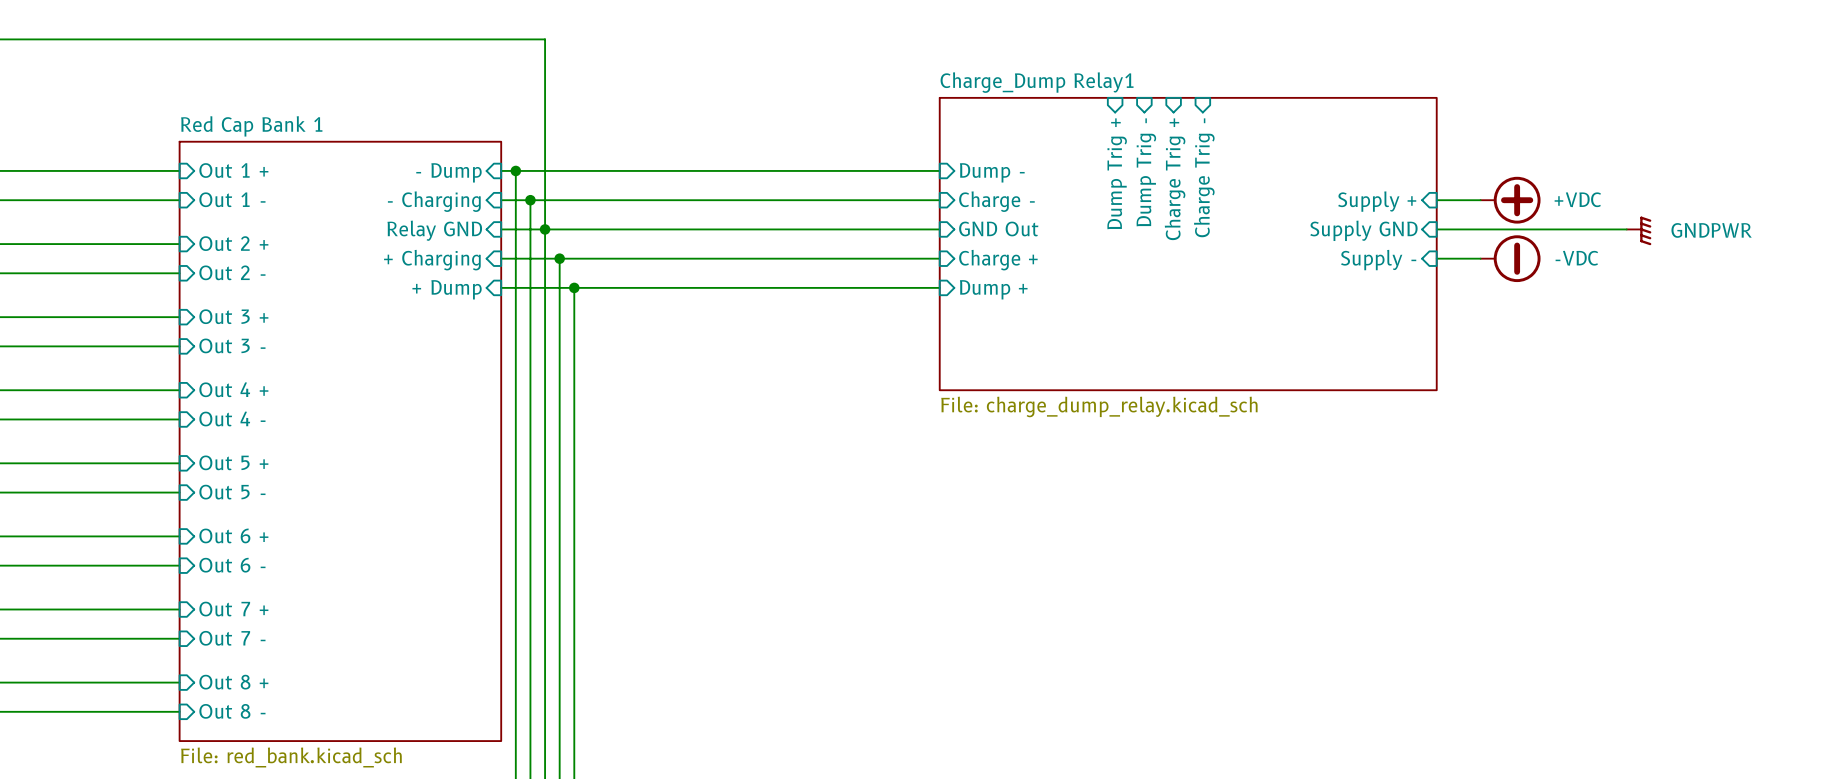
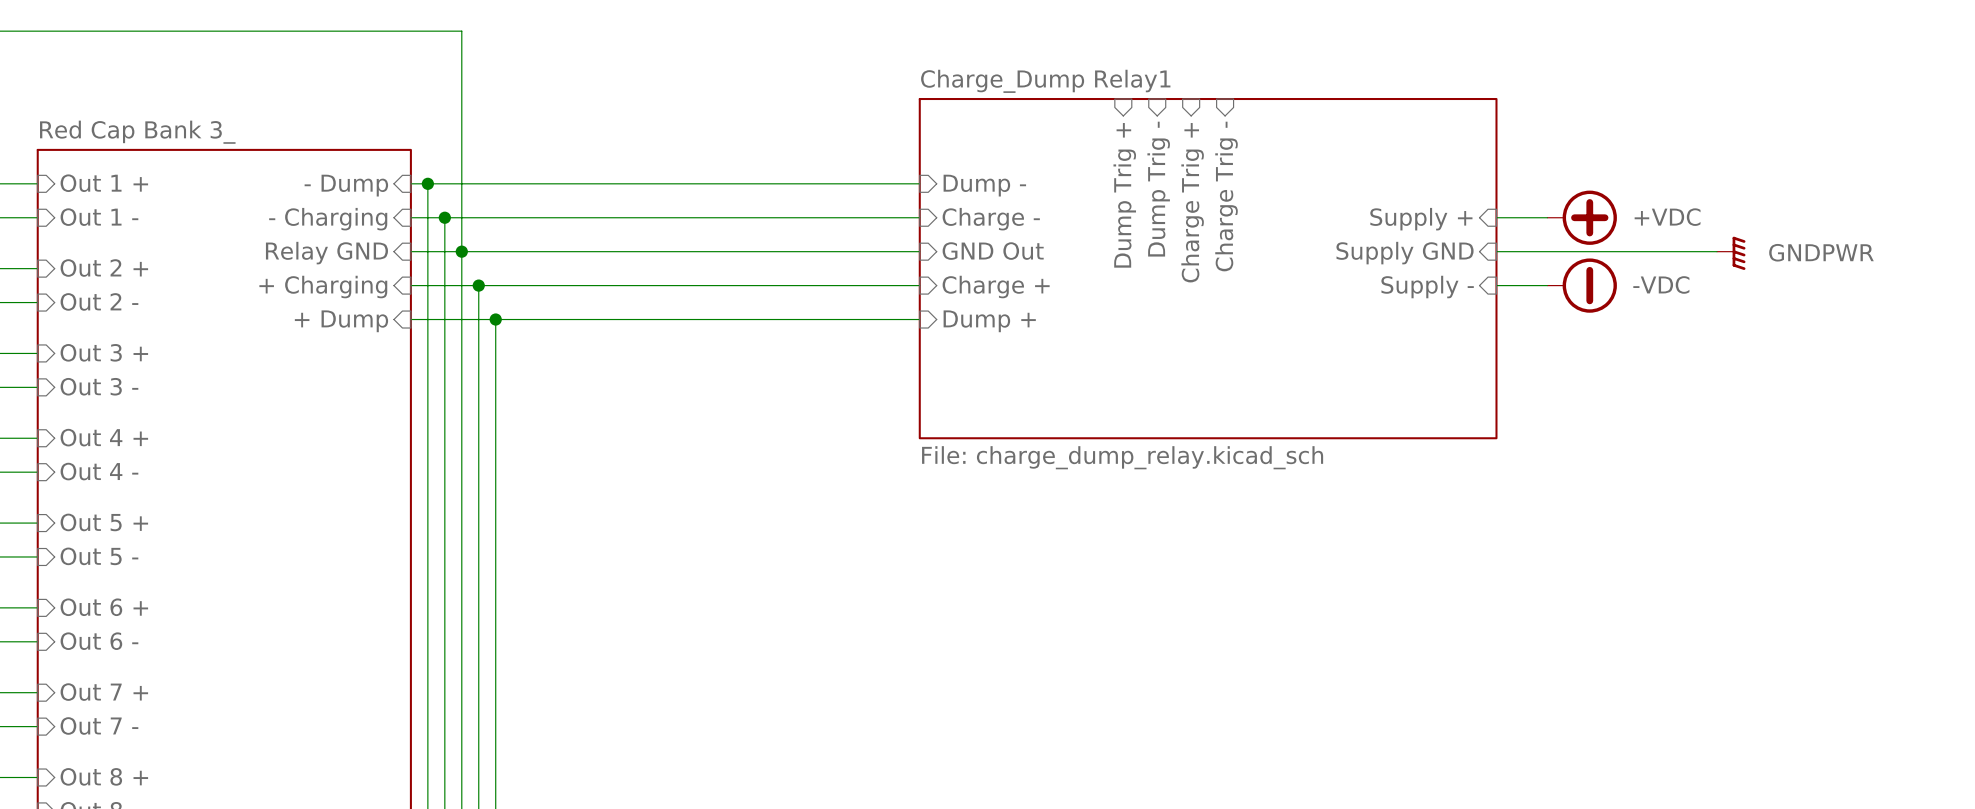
sheet Red Cap Bank 1 name: Red Cap Bank 1 (251, 126) -> Red Cap Bank 3_ (137, 132)

